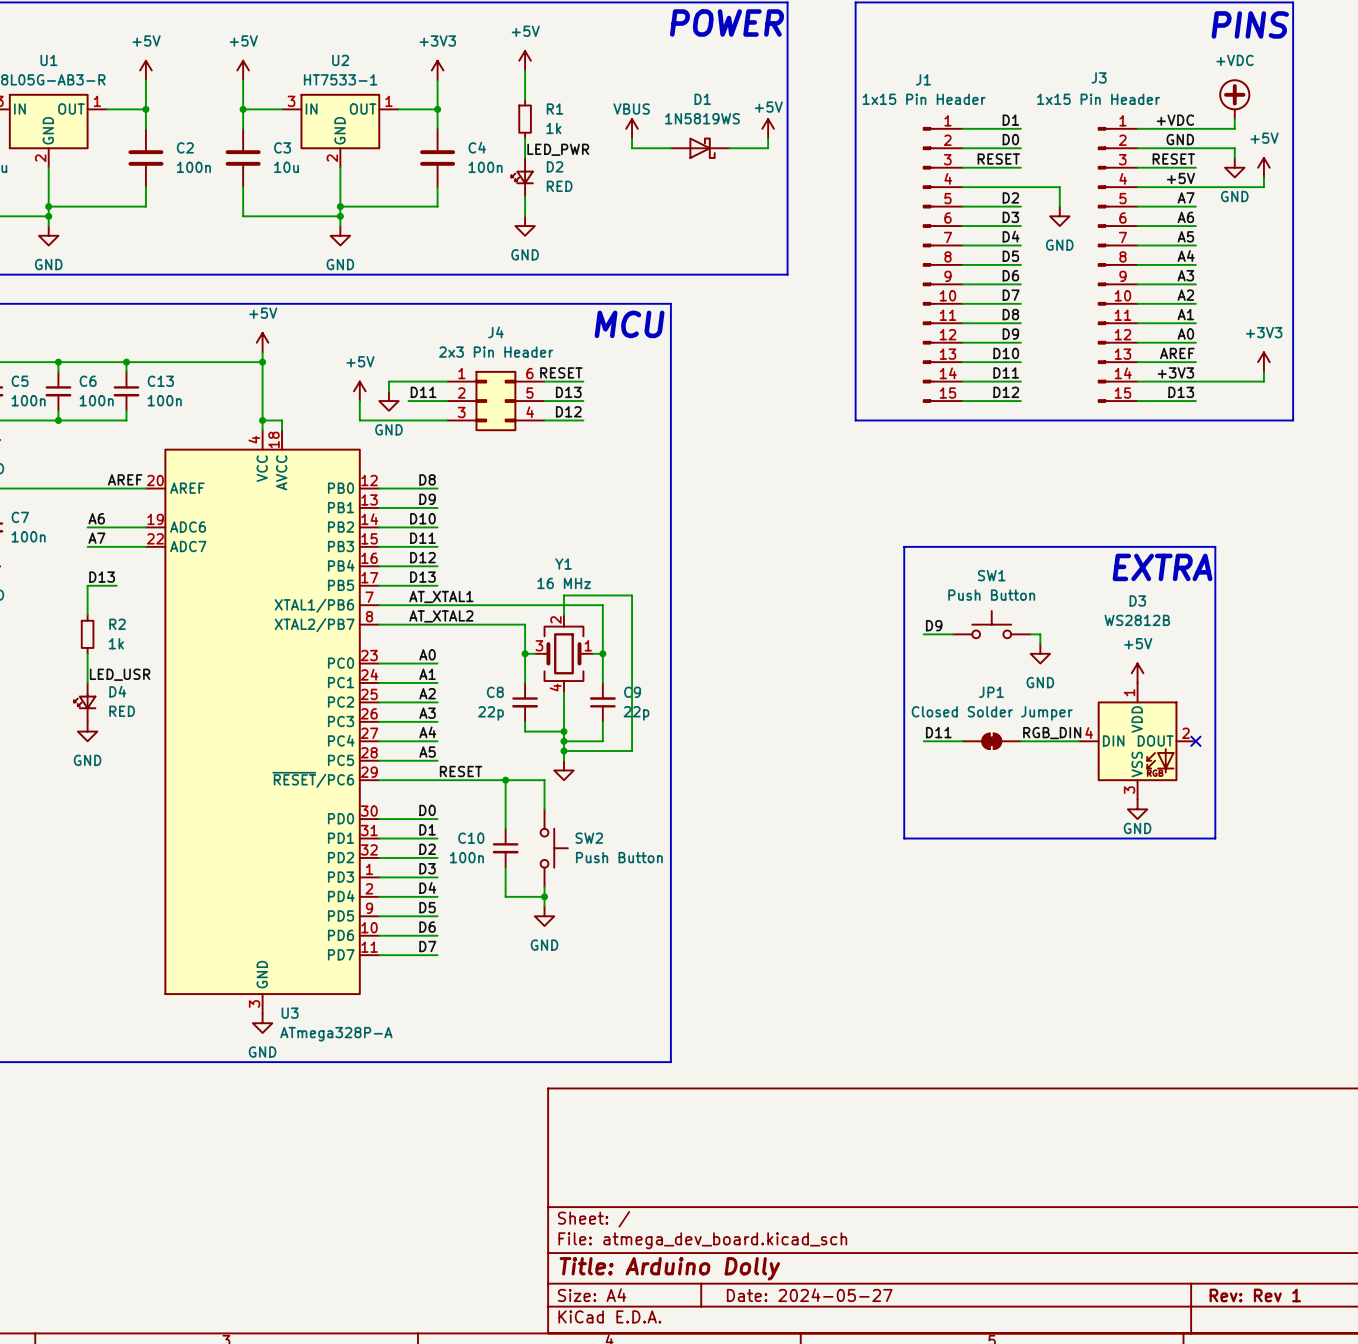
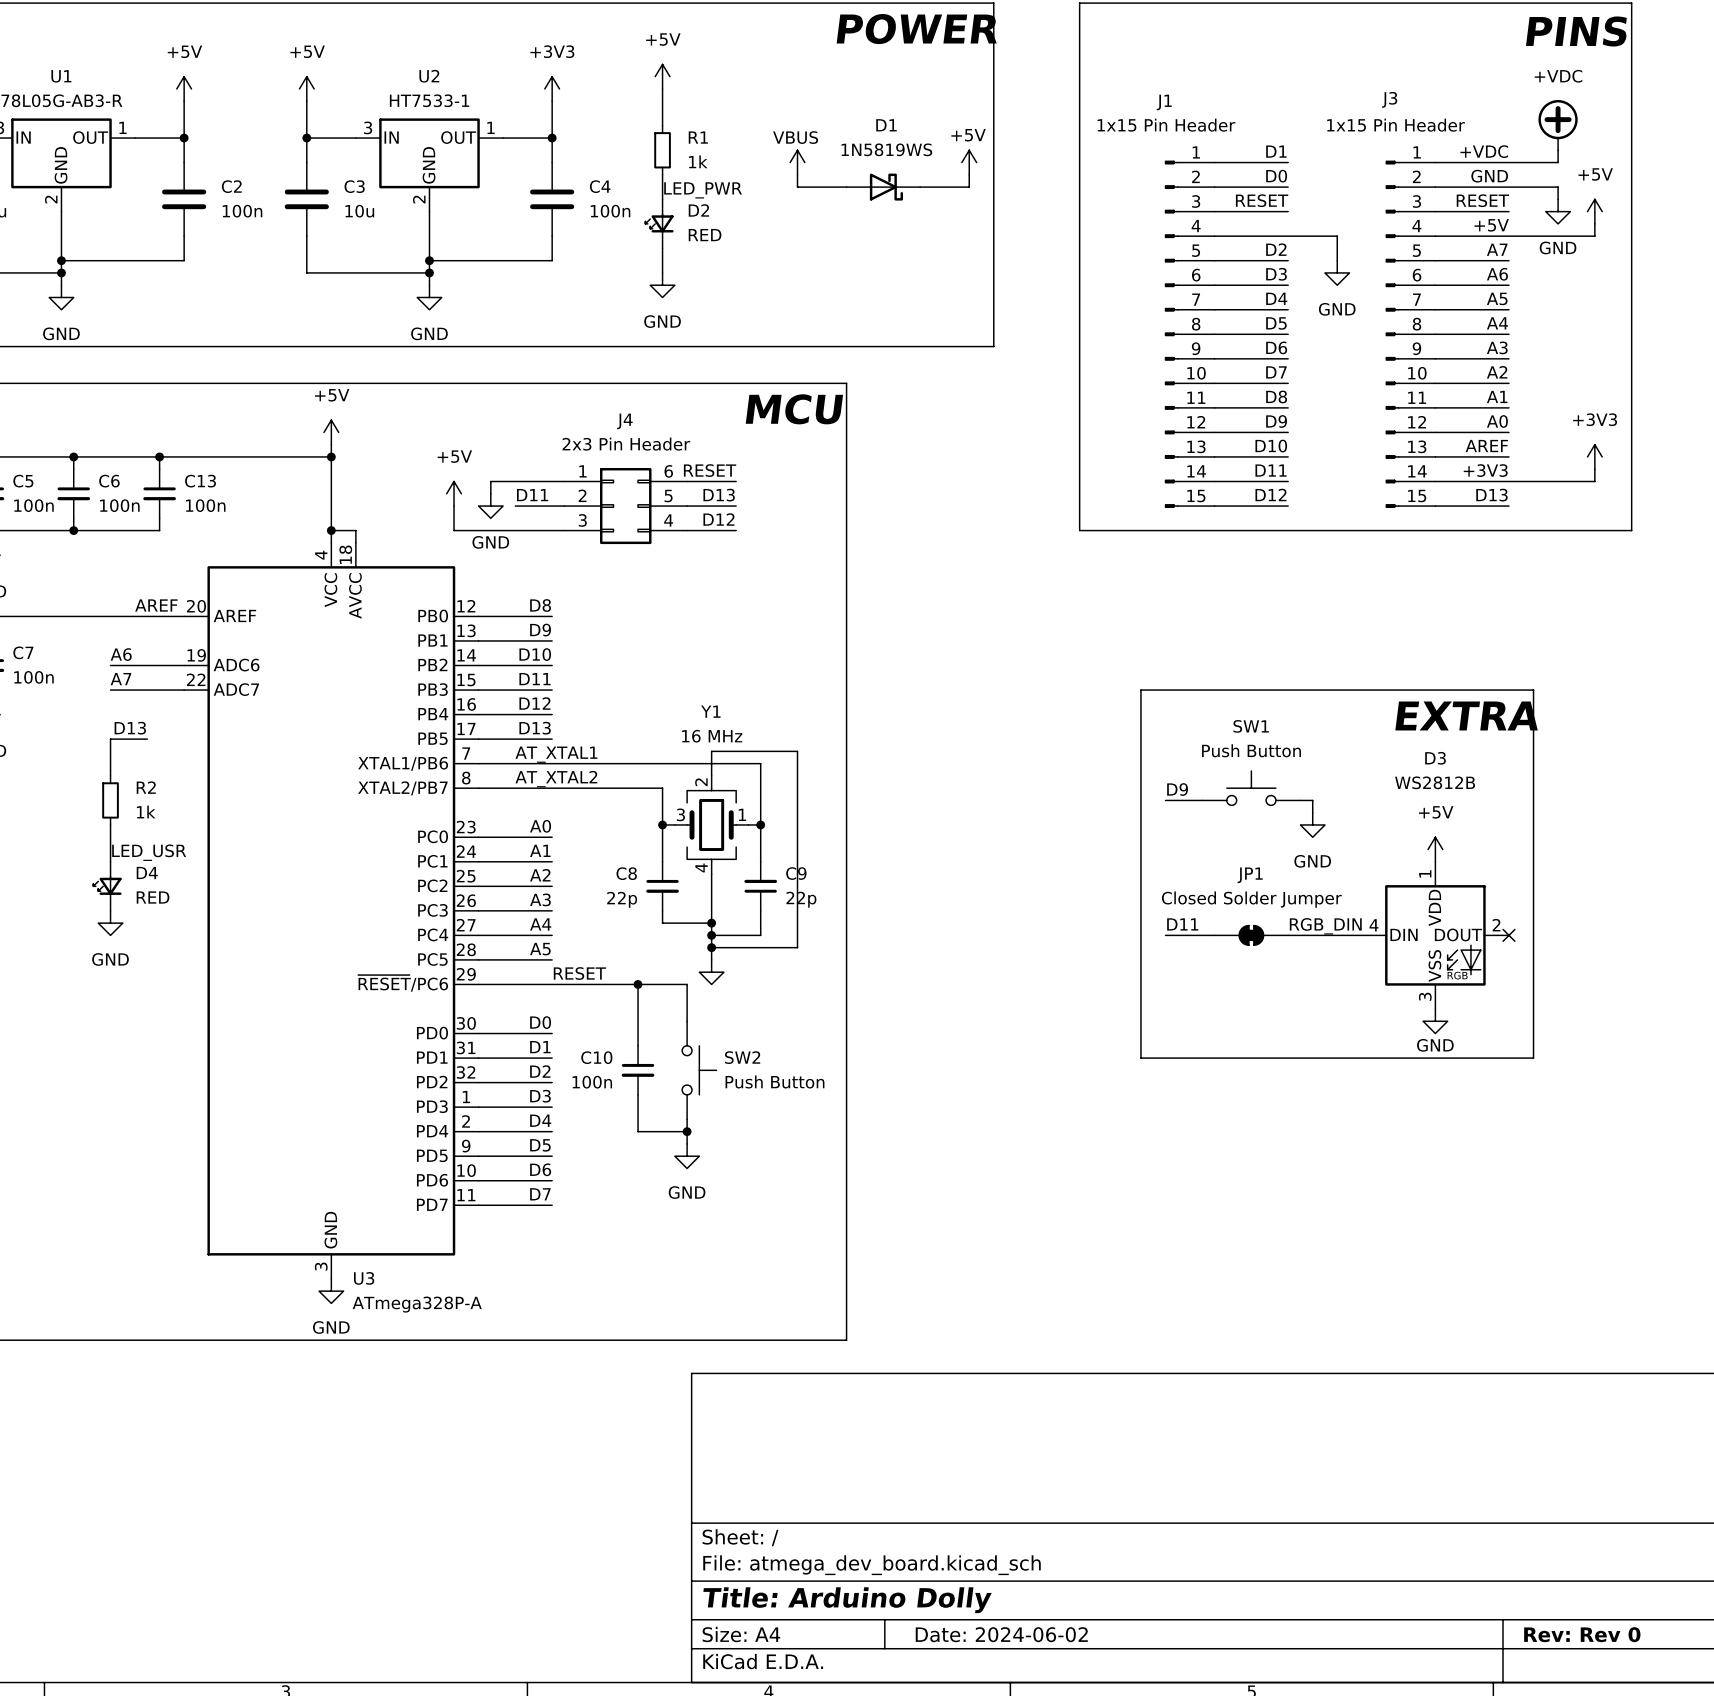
title block: Date: 2024-05-27 (809, 1295) -> Date: 2024-06-02 (1001, 1634)
title block: Rev: Rev 1 (1255, 1295) -> Rev: Rev 0 (1582, 1634)

